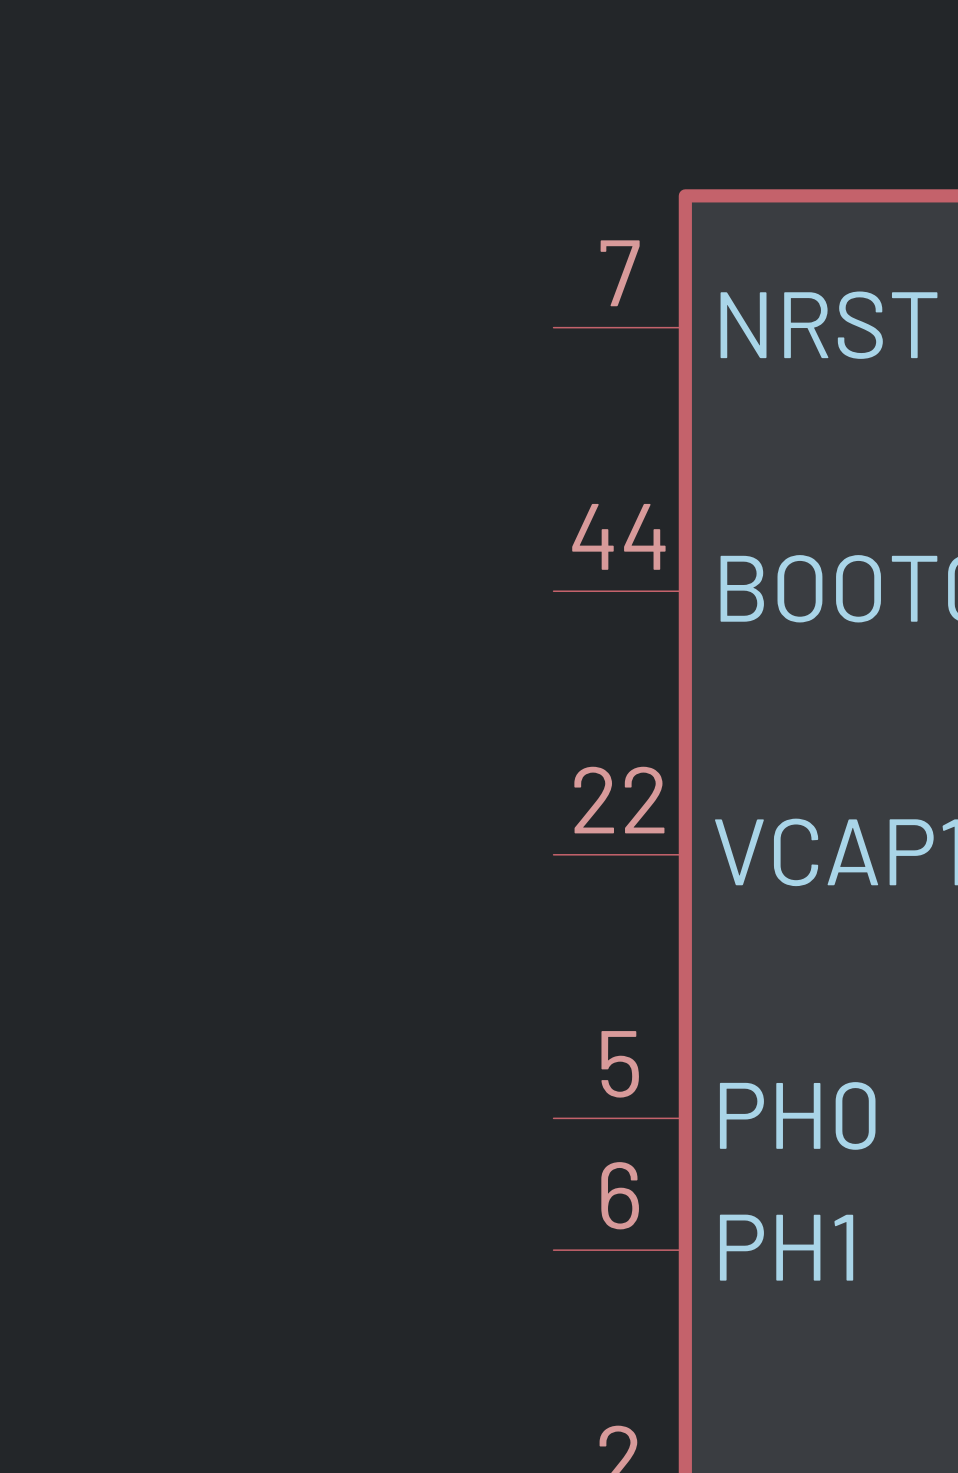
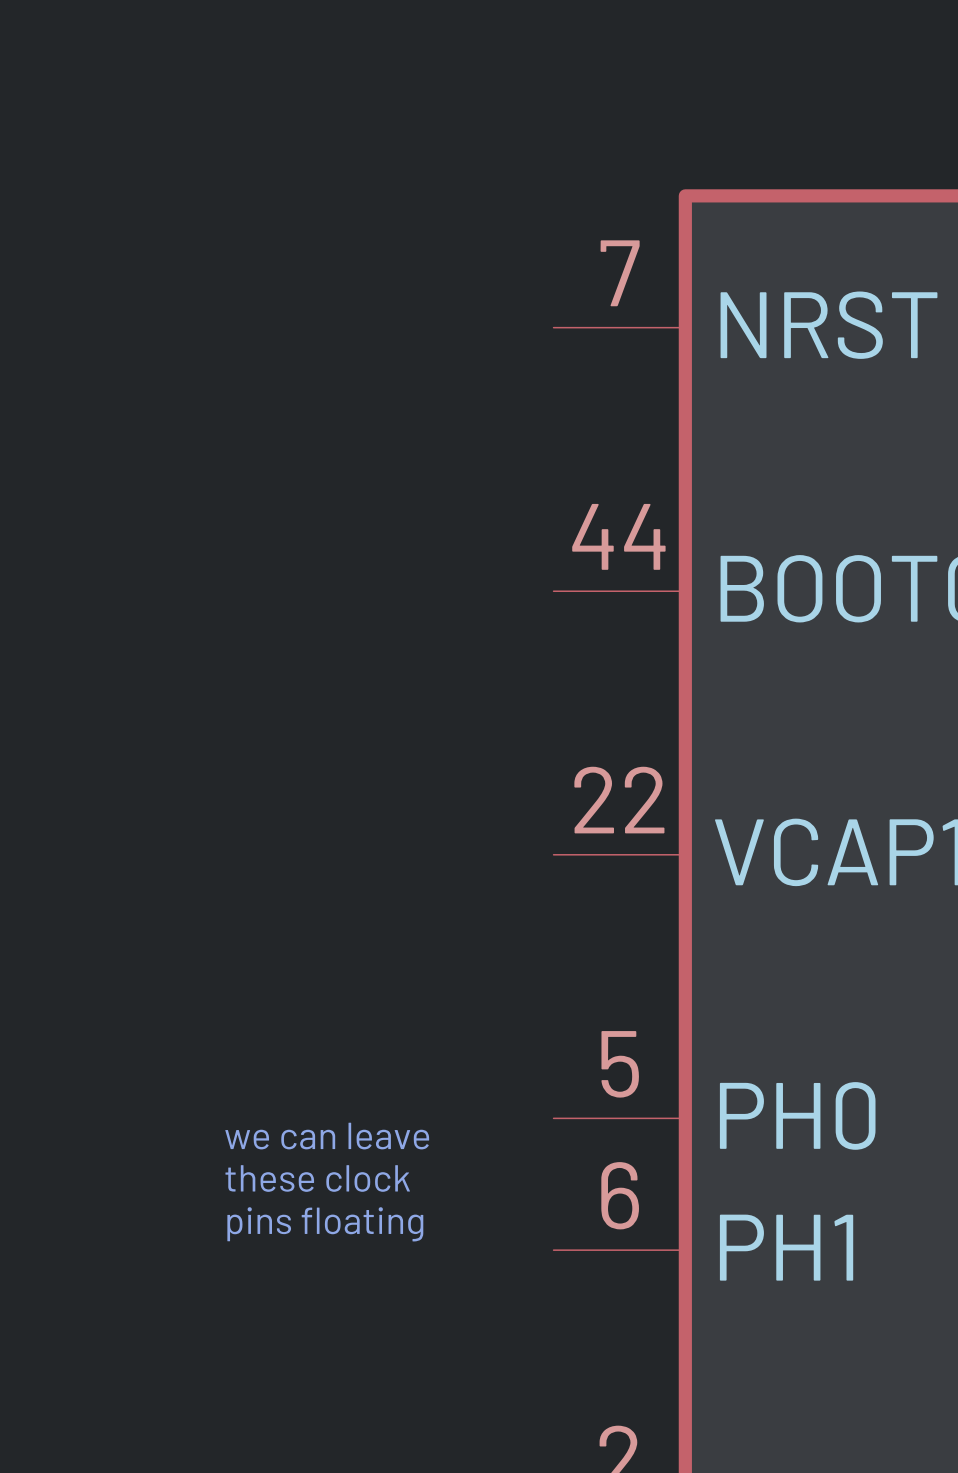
text: none -> we can leave (327, 1136)
text: none -> these clock (317, 1178)
text: none -> pins floating (325, 1224)

